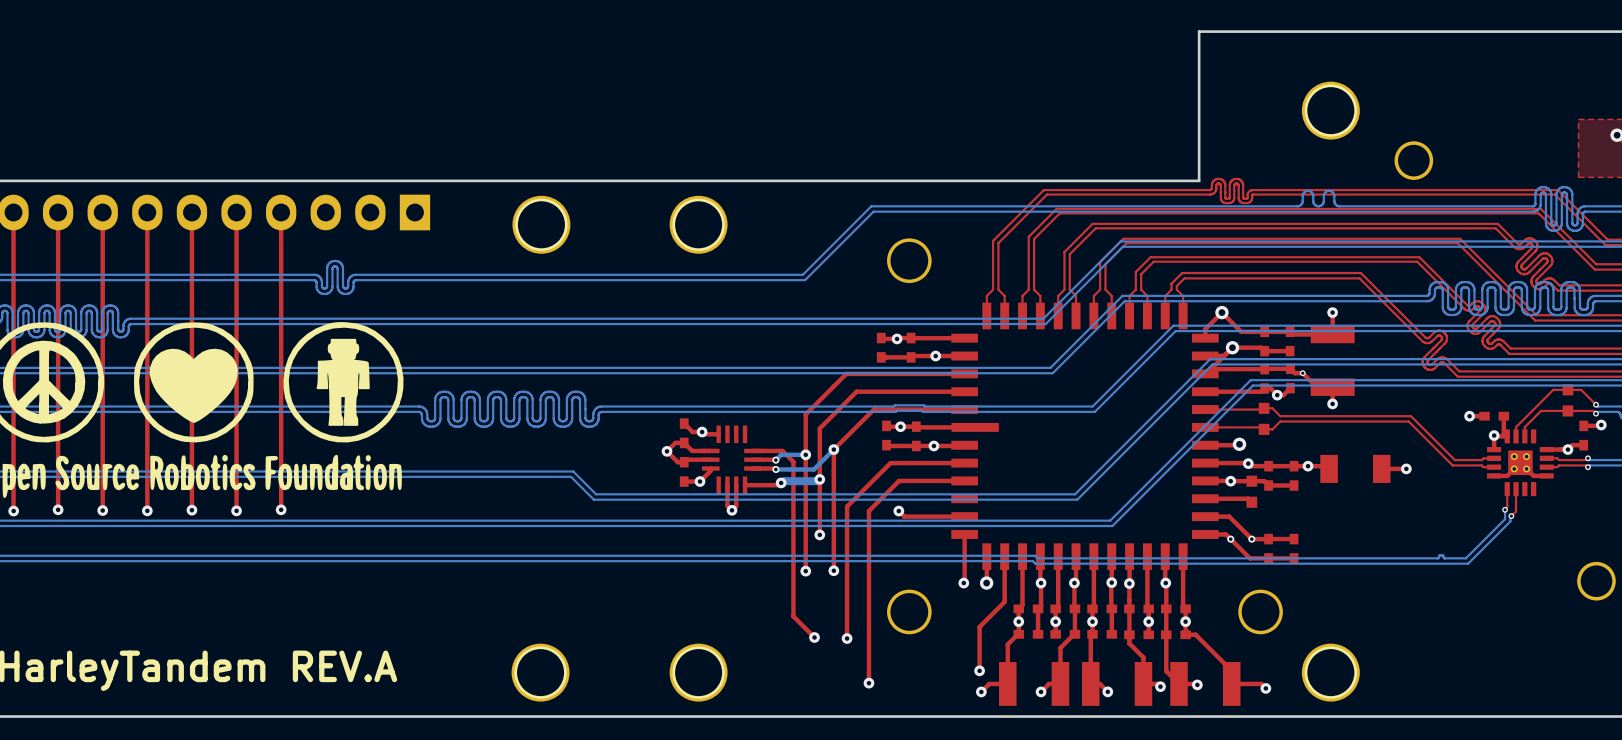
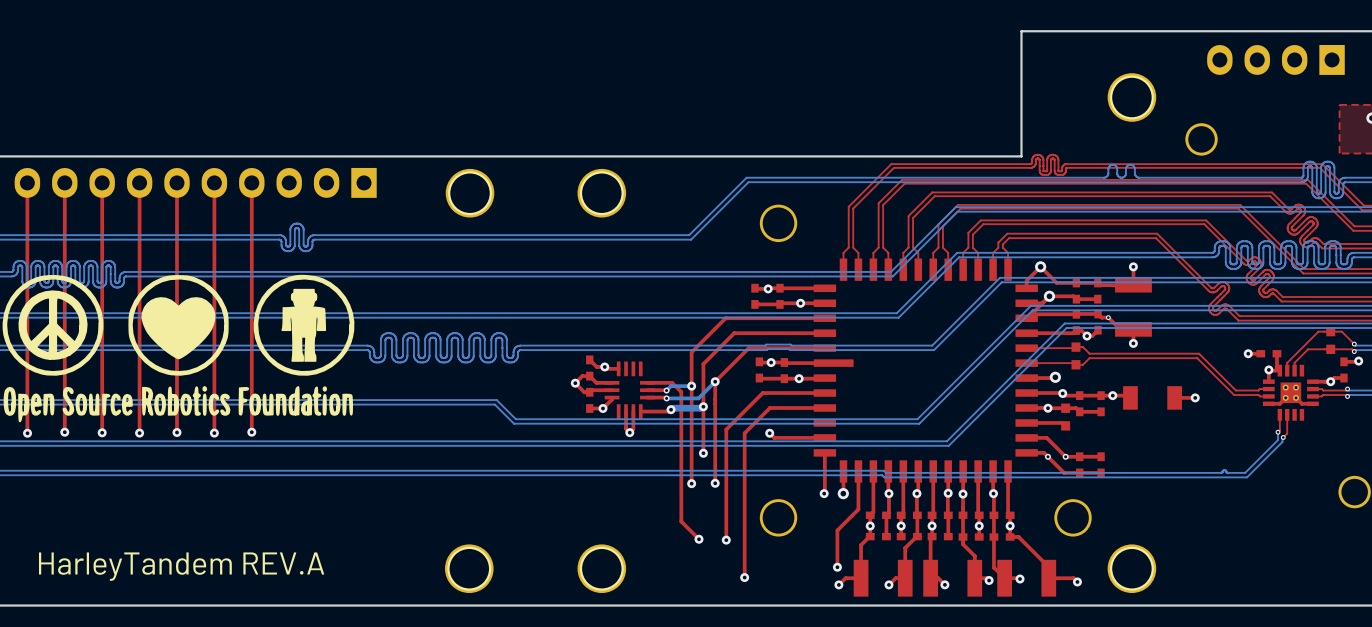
part: none -> (1275, 59)

